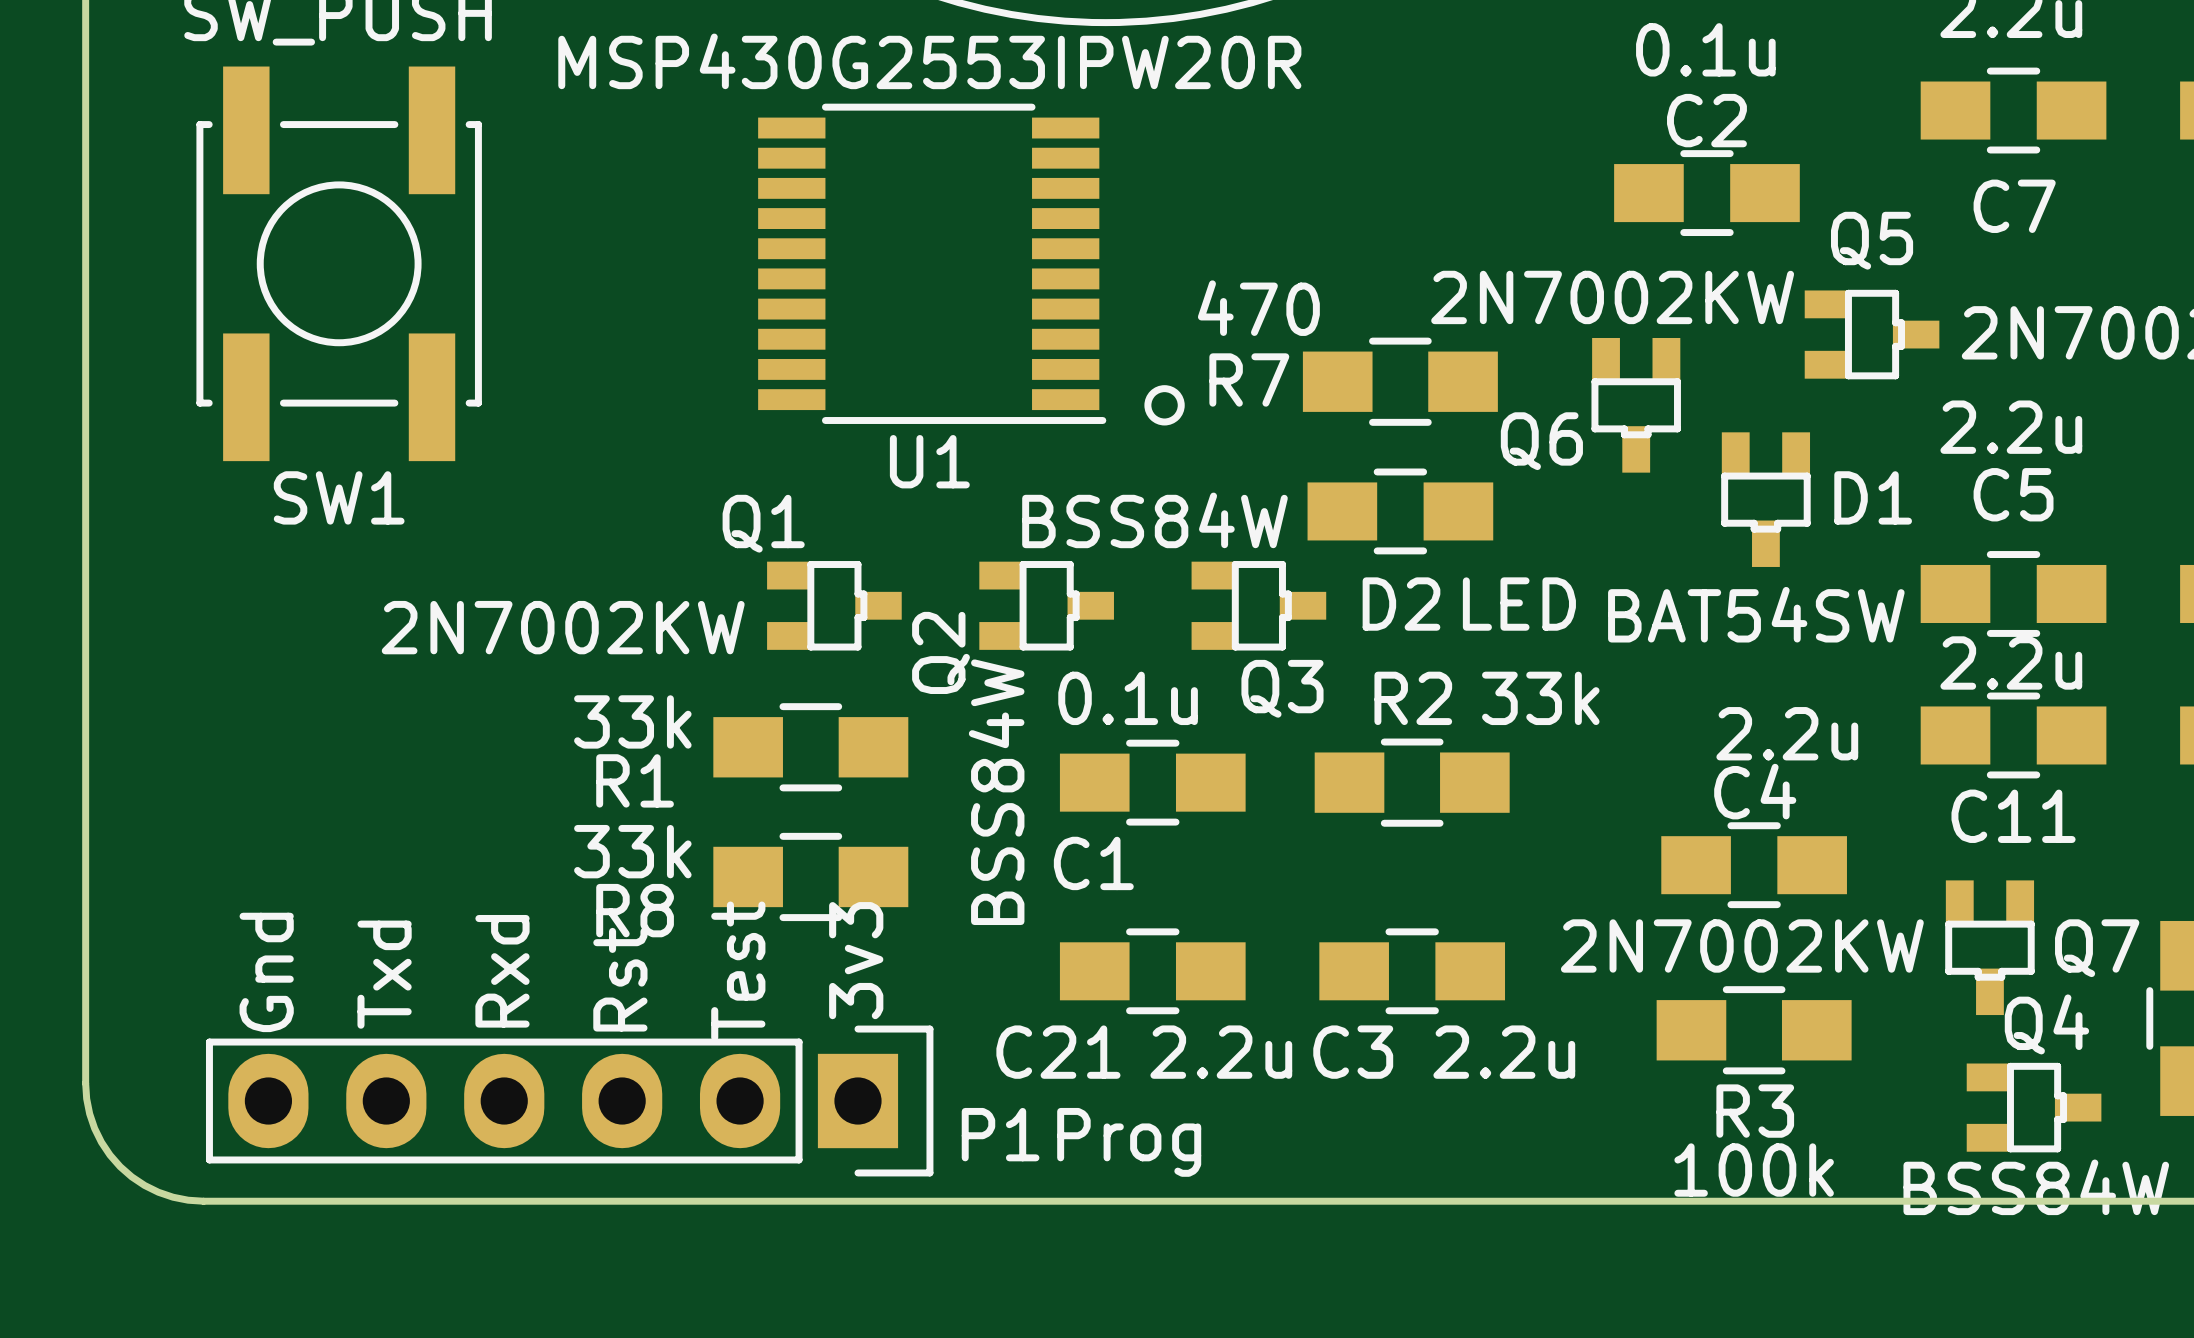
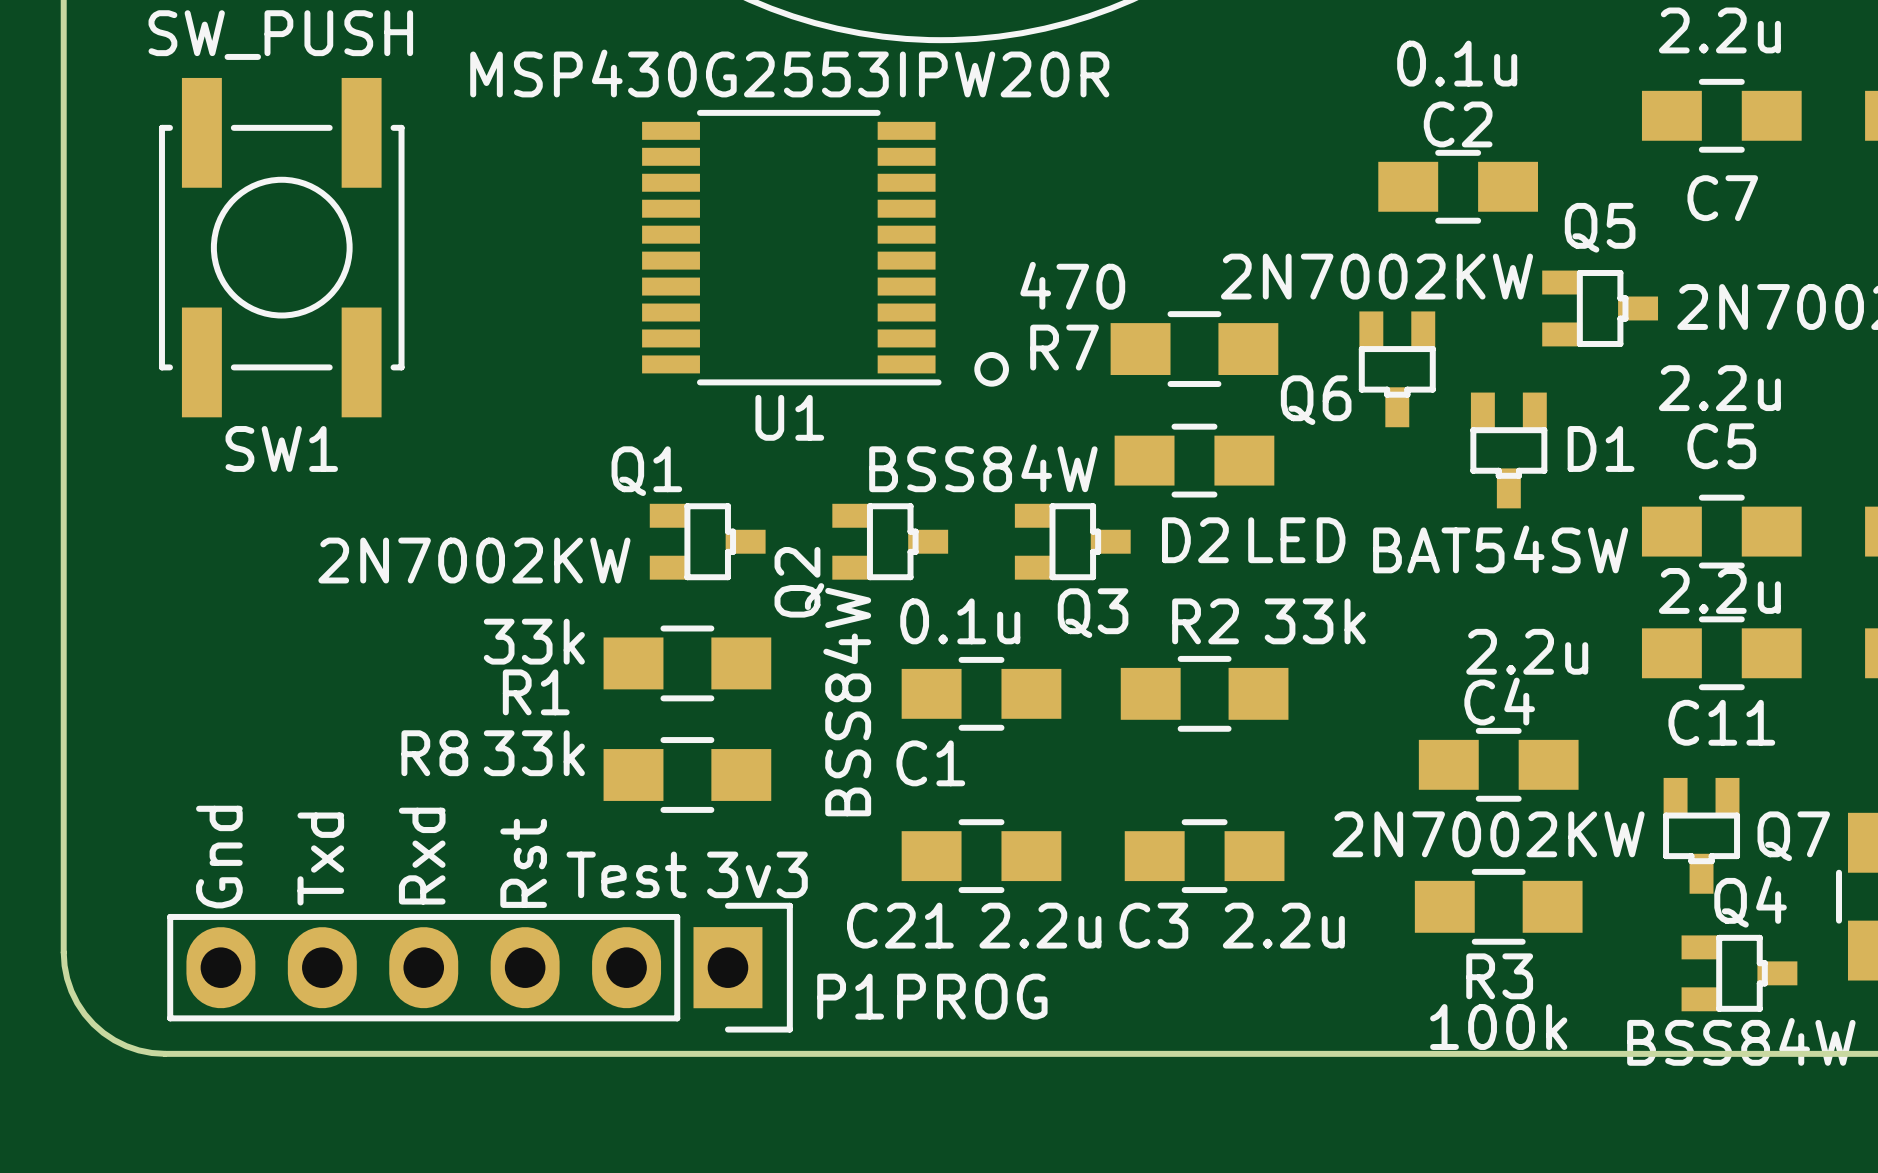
R8 name position: R8 (635, 910) -> R8 (434, 753)
text rotation: 0° (856, 960) -> 90° clockwise (757, 874)
text rotation: 0° (738, 971) -> 90° clockwise (626, 874)
P1 value: Prog (1129, 1142) -> PROG (972, 996)

